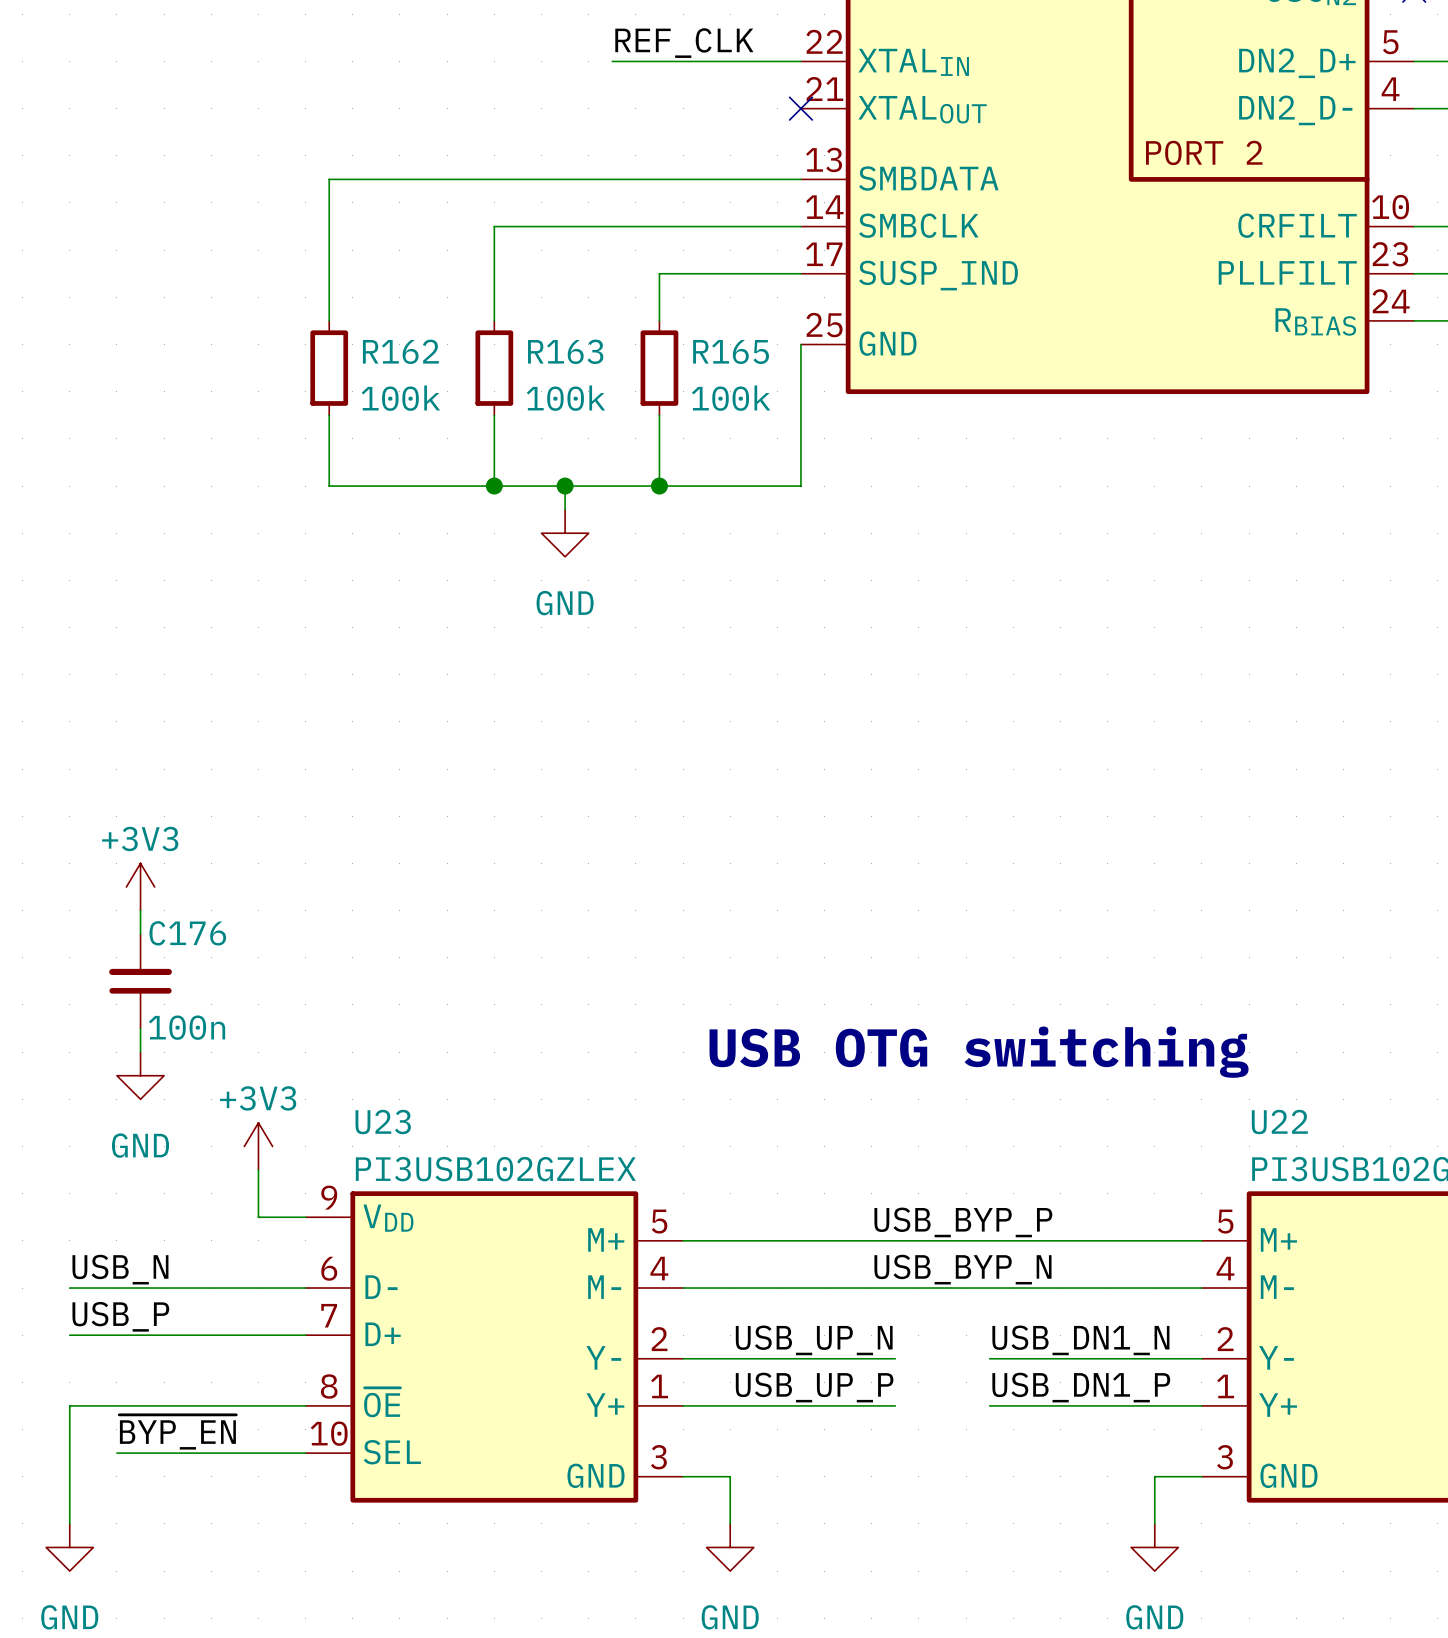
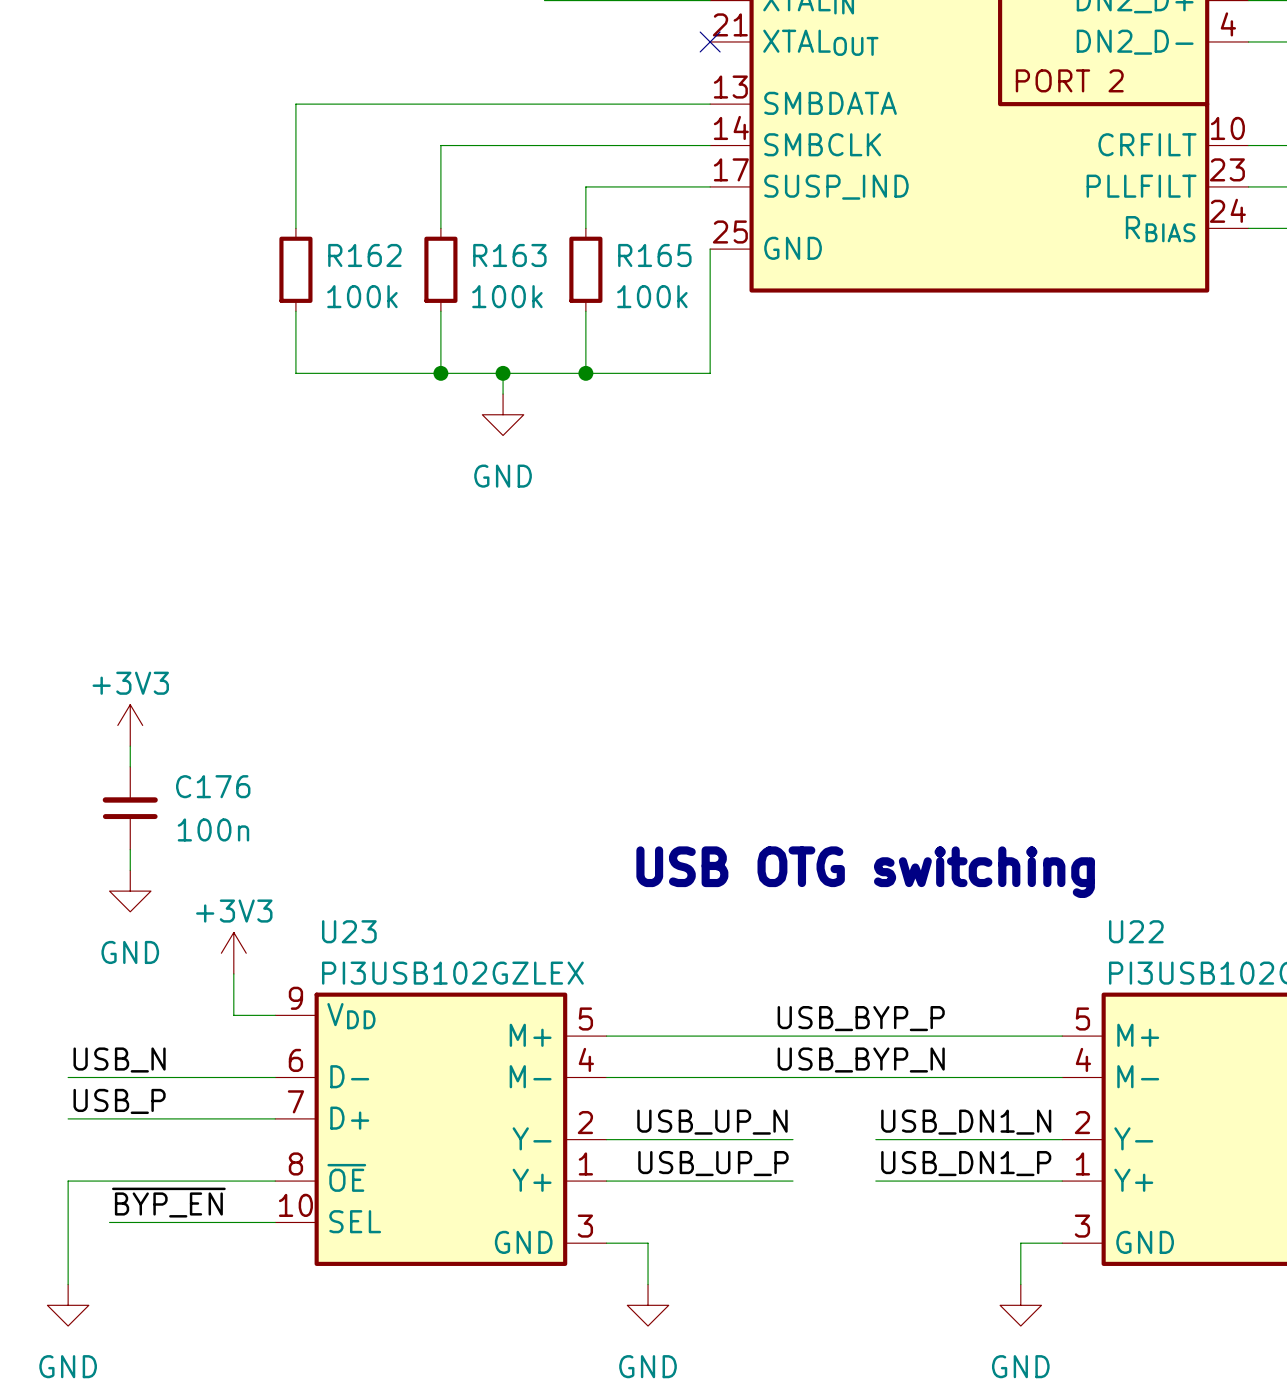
C176 name position: C176 (187, 933) -> C176 (213, 786)
C176 text position: 100n (187, 1027) -> 100n (213, 829)

